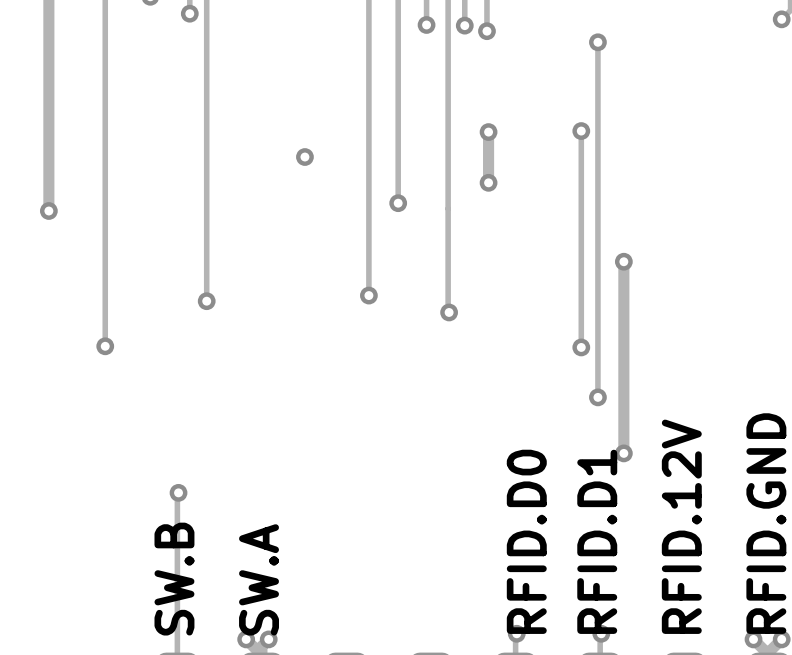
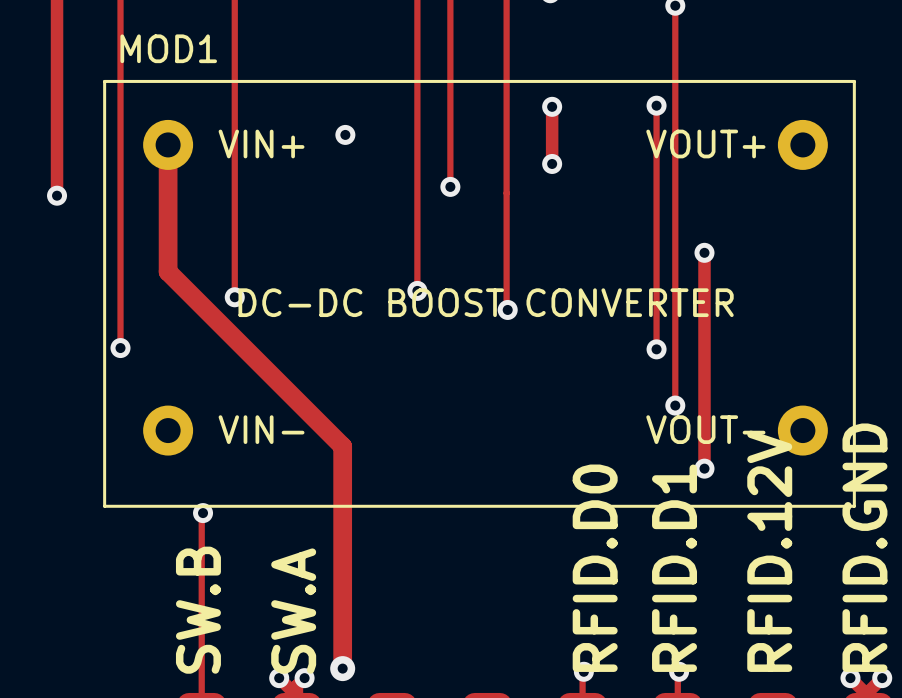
track: none -> (168, 144) (168, 271) (342, 446) (342, 668)
MOD1: none -> (479, 293)
via: none -> (342, 668)

